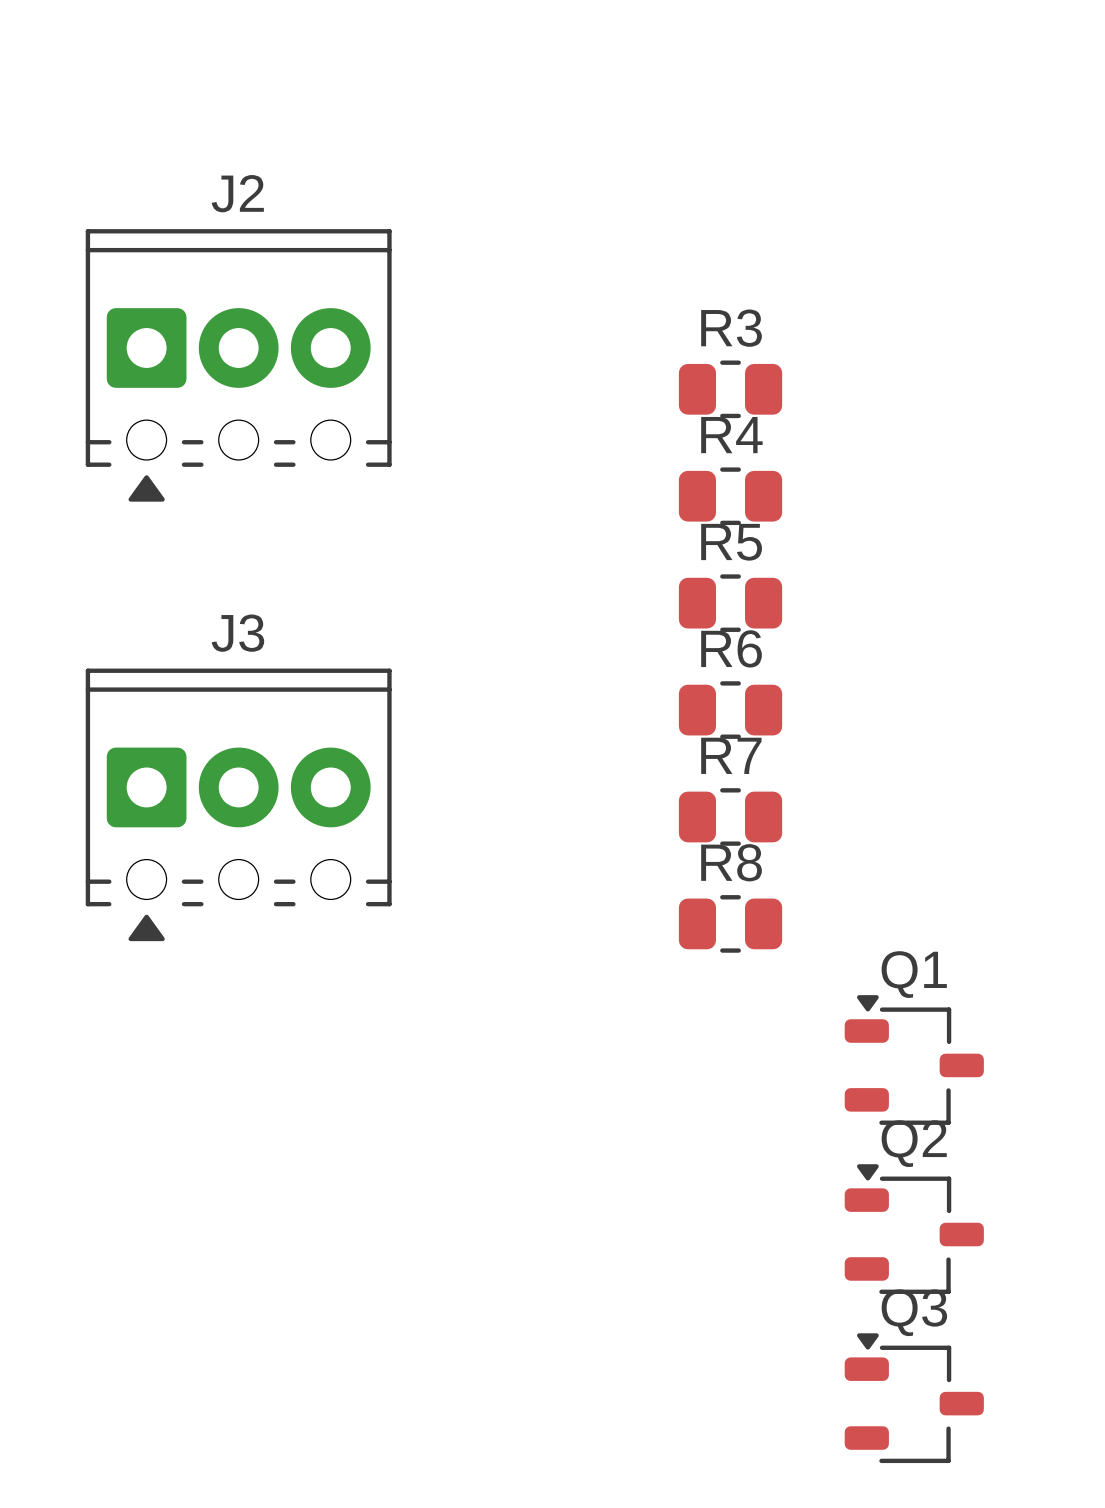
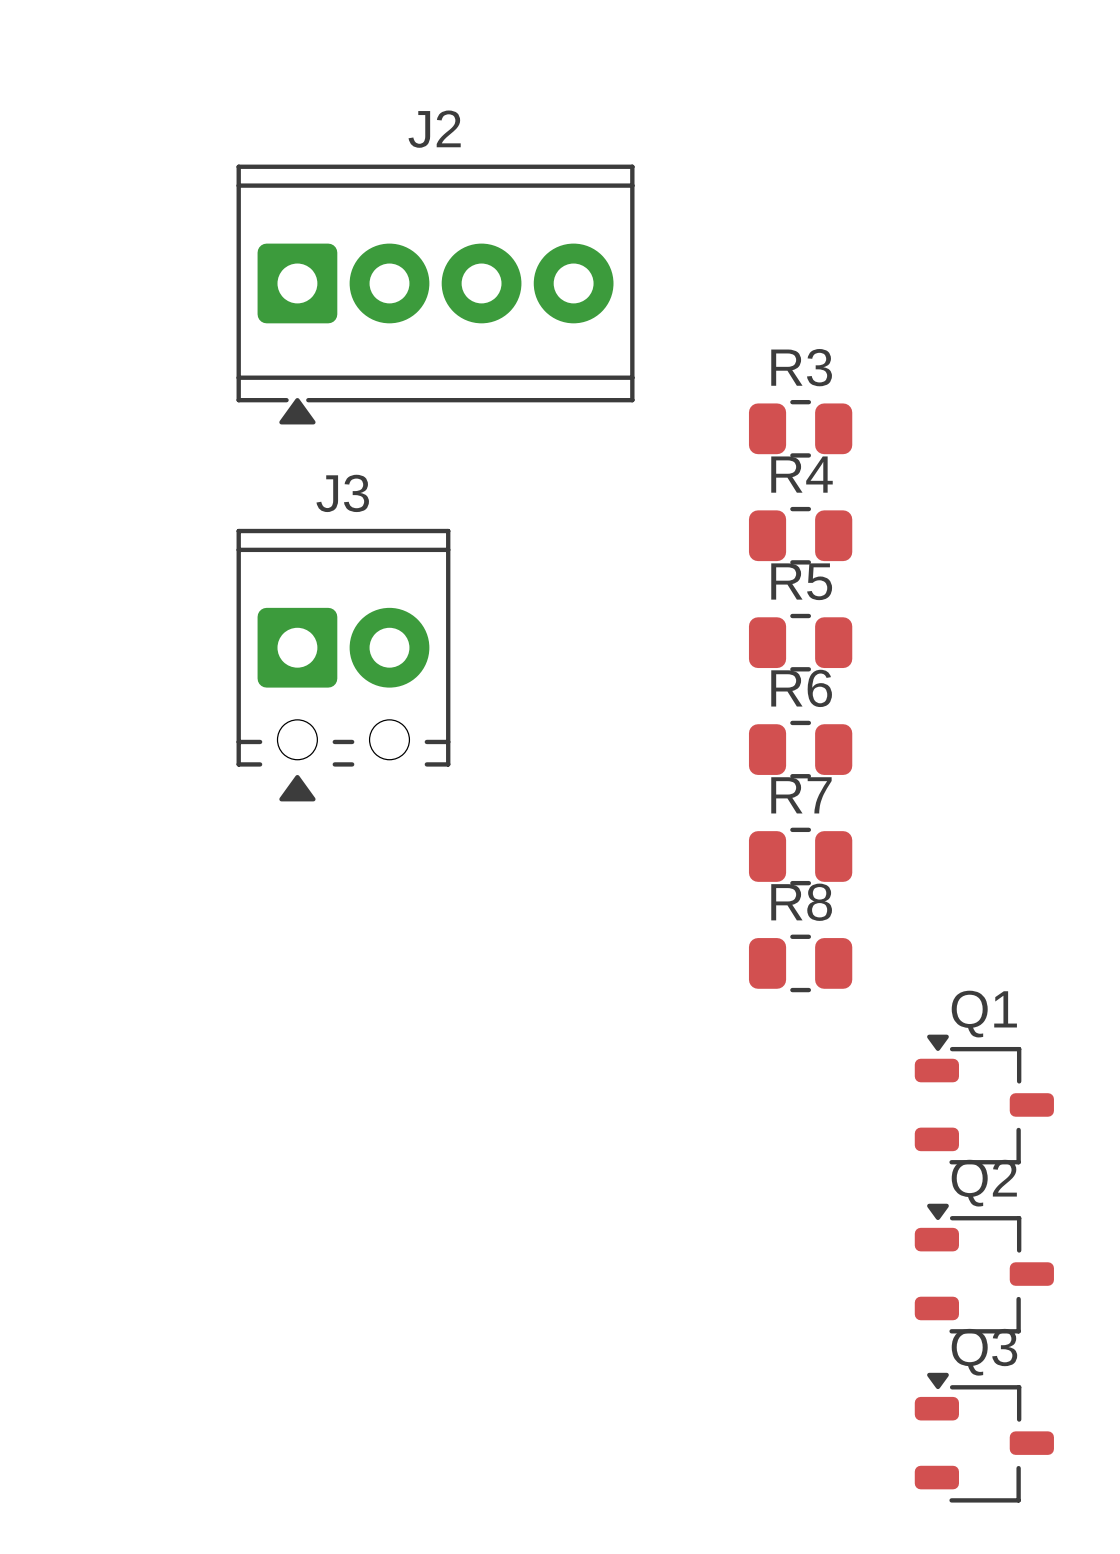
J2 footprint: [85, 229, 392, 502] -> [236, 164, 635, 425]
J3 footprint: [85, 668, 392, 942] -> [236, 528, 451, 802]

